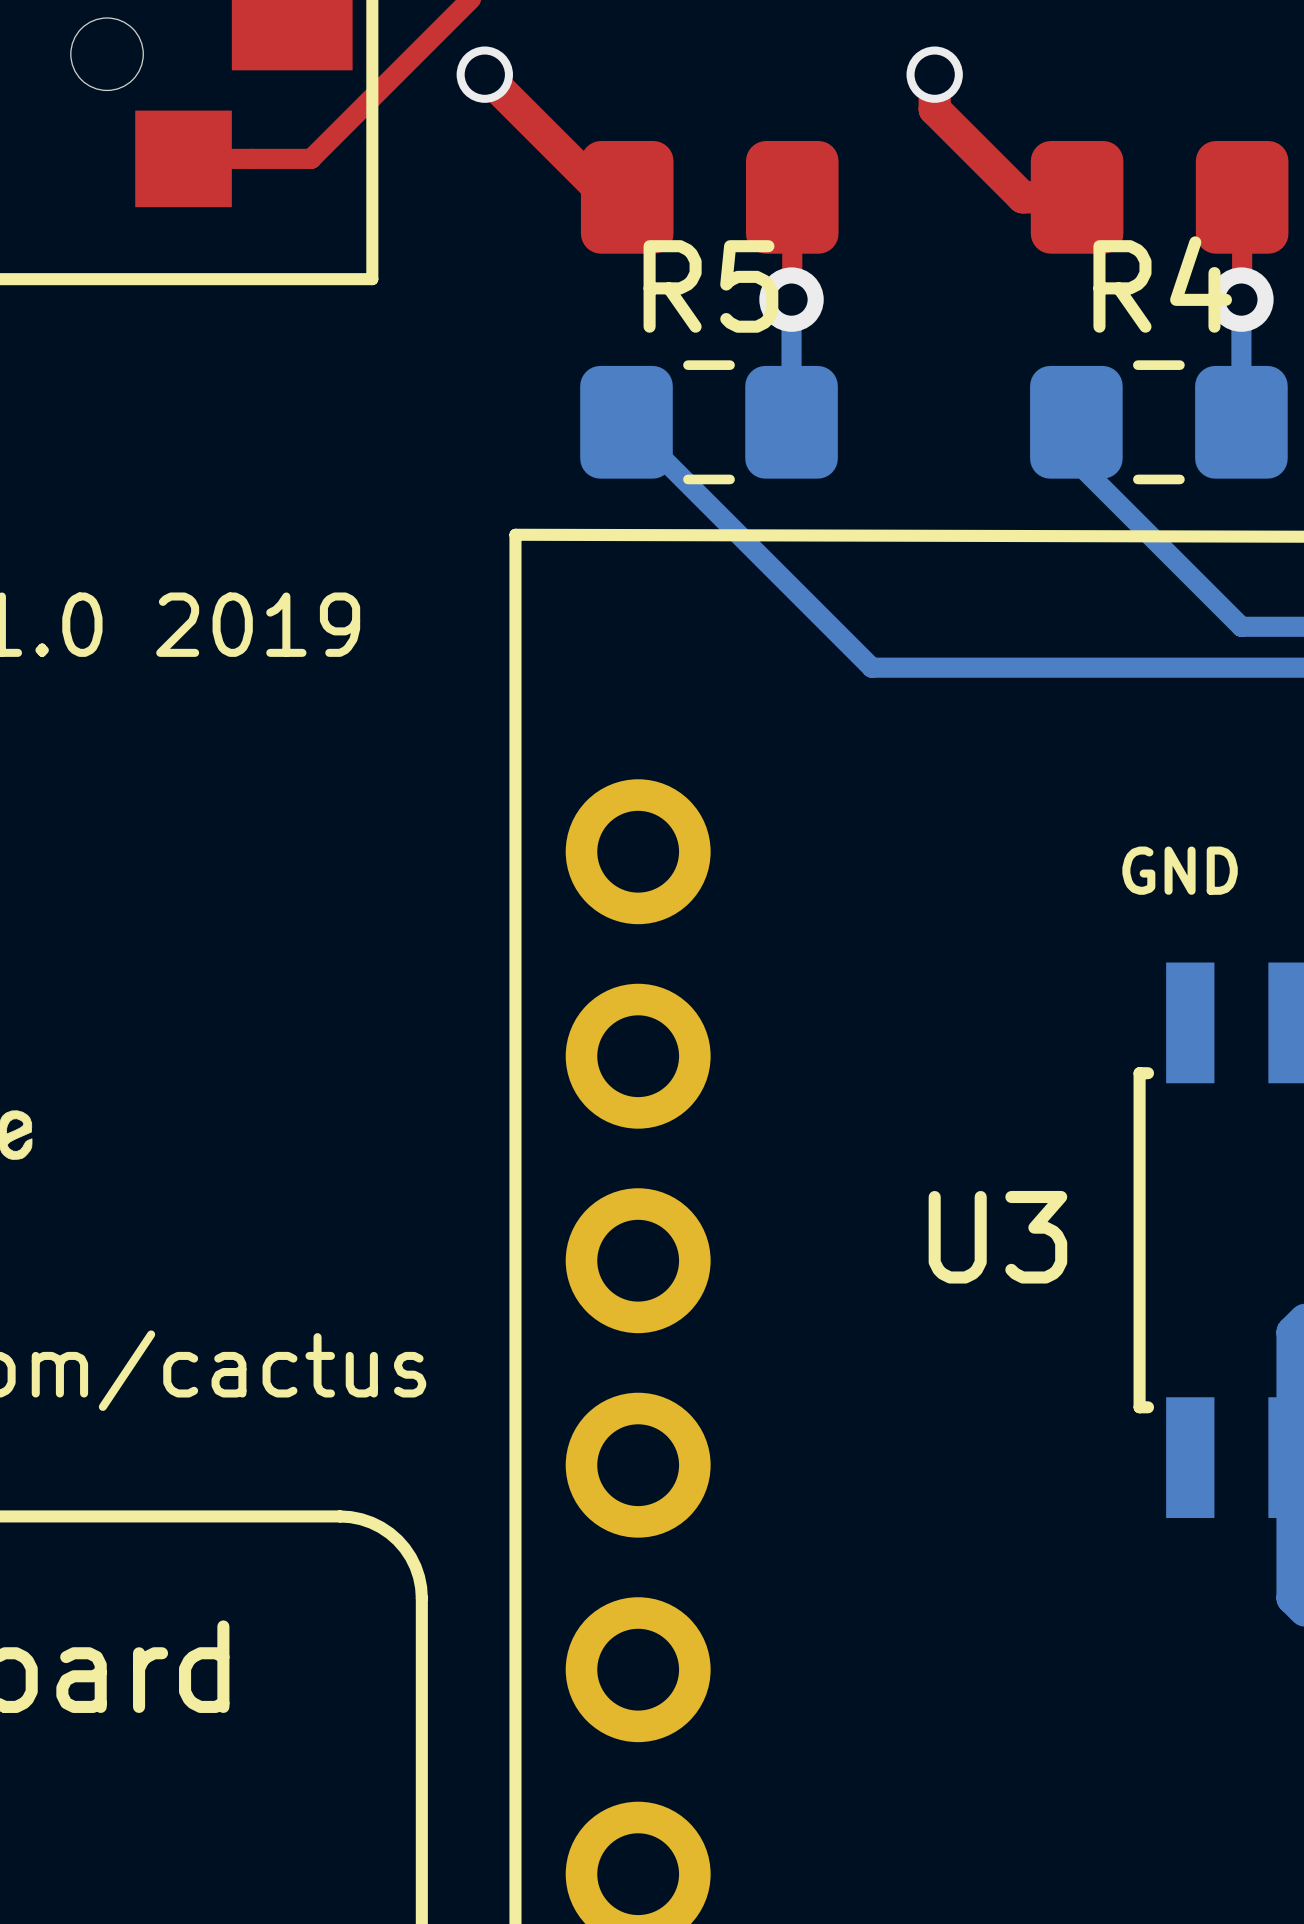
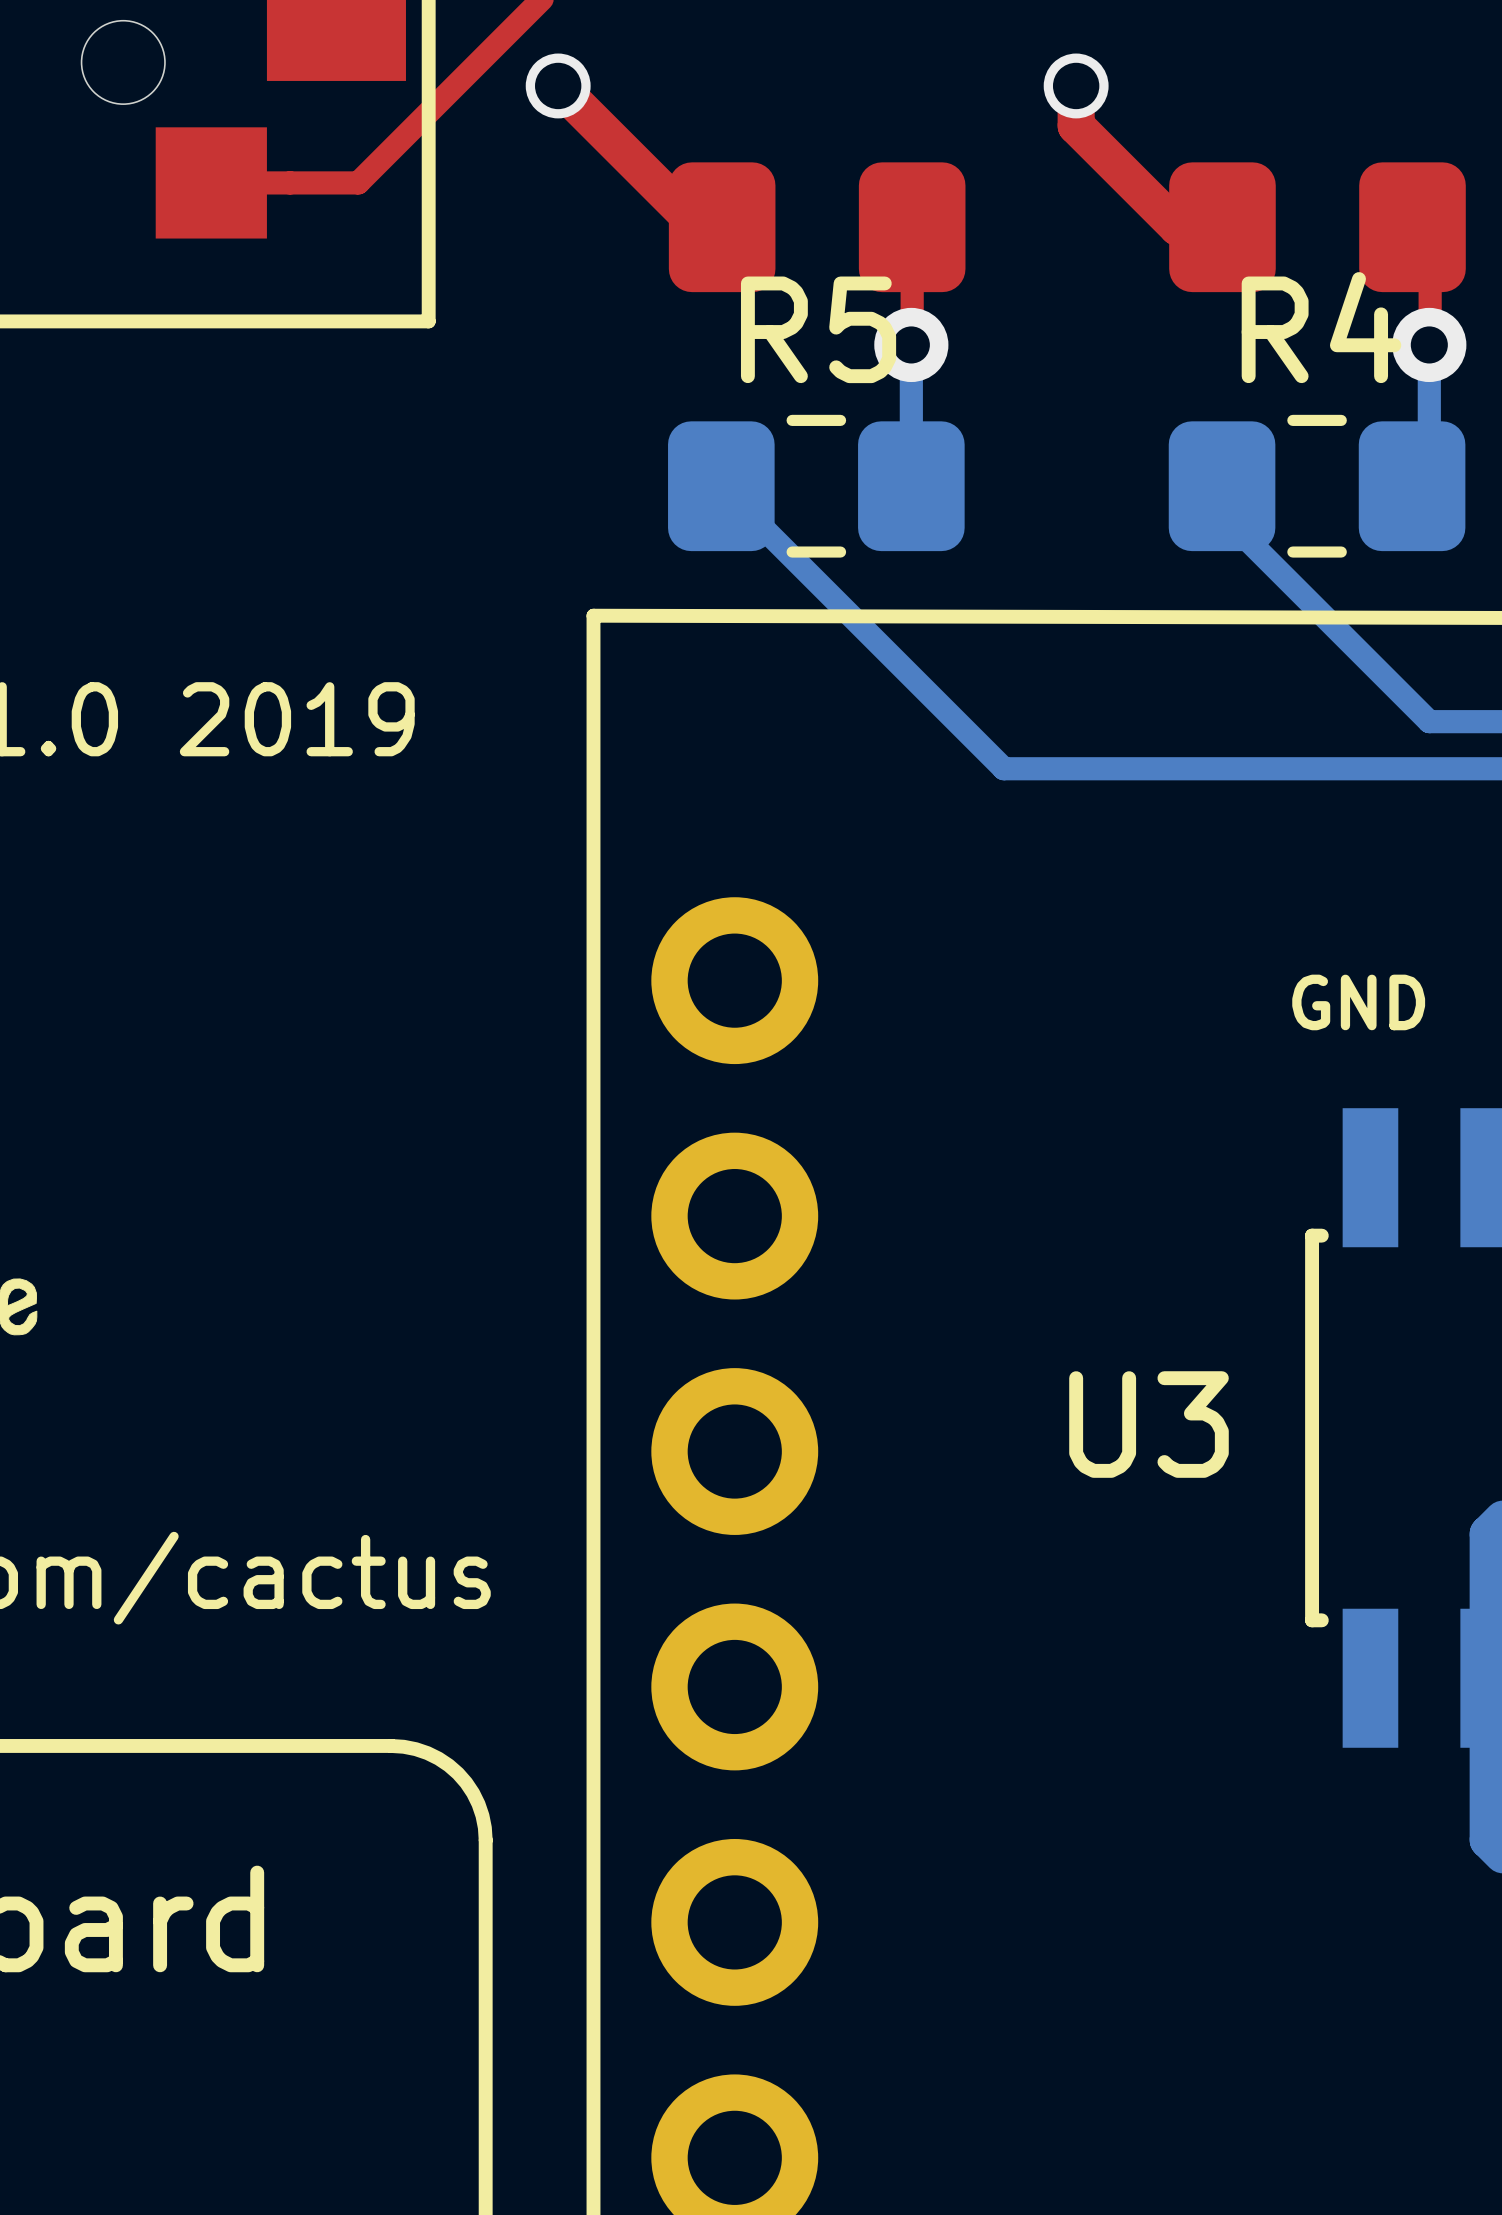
part position: (1159, 197) -> (1317, 227)
R4 position: (1158, 422) -> (1317, 486)

